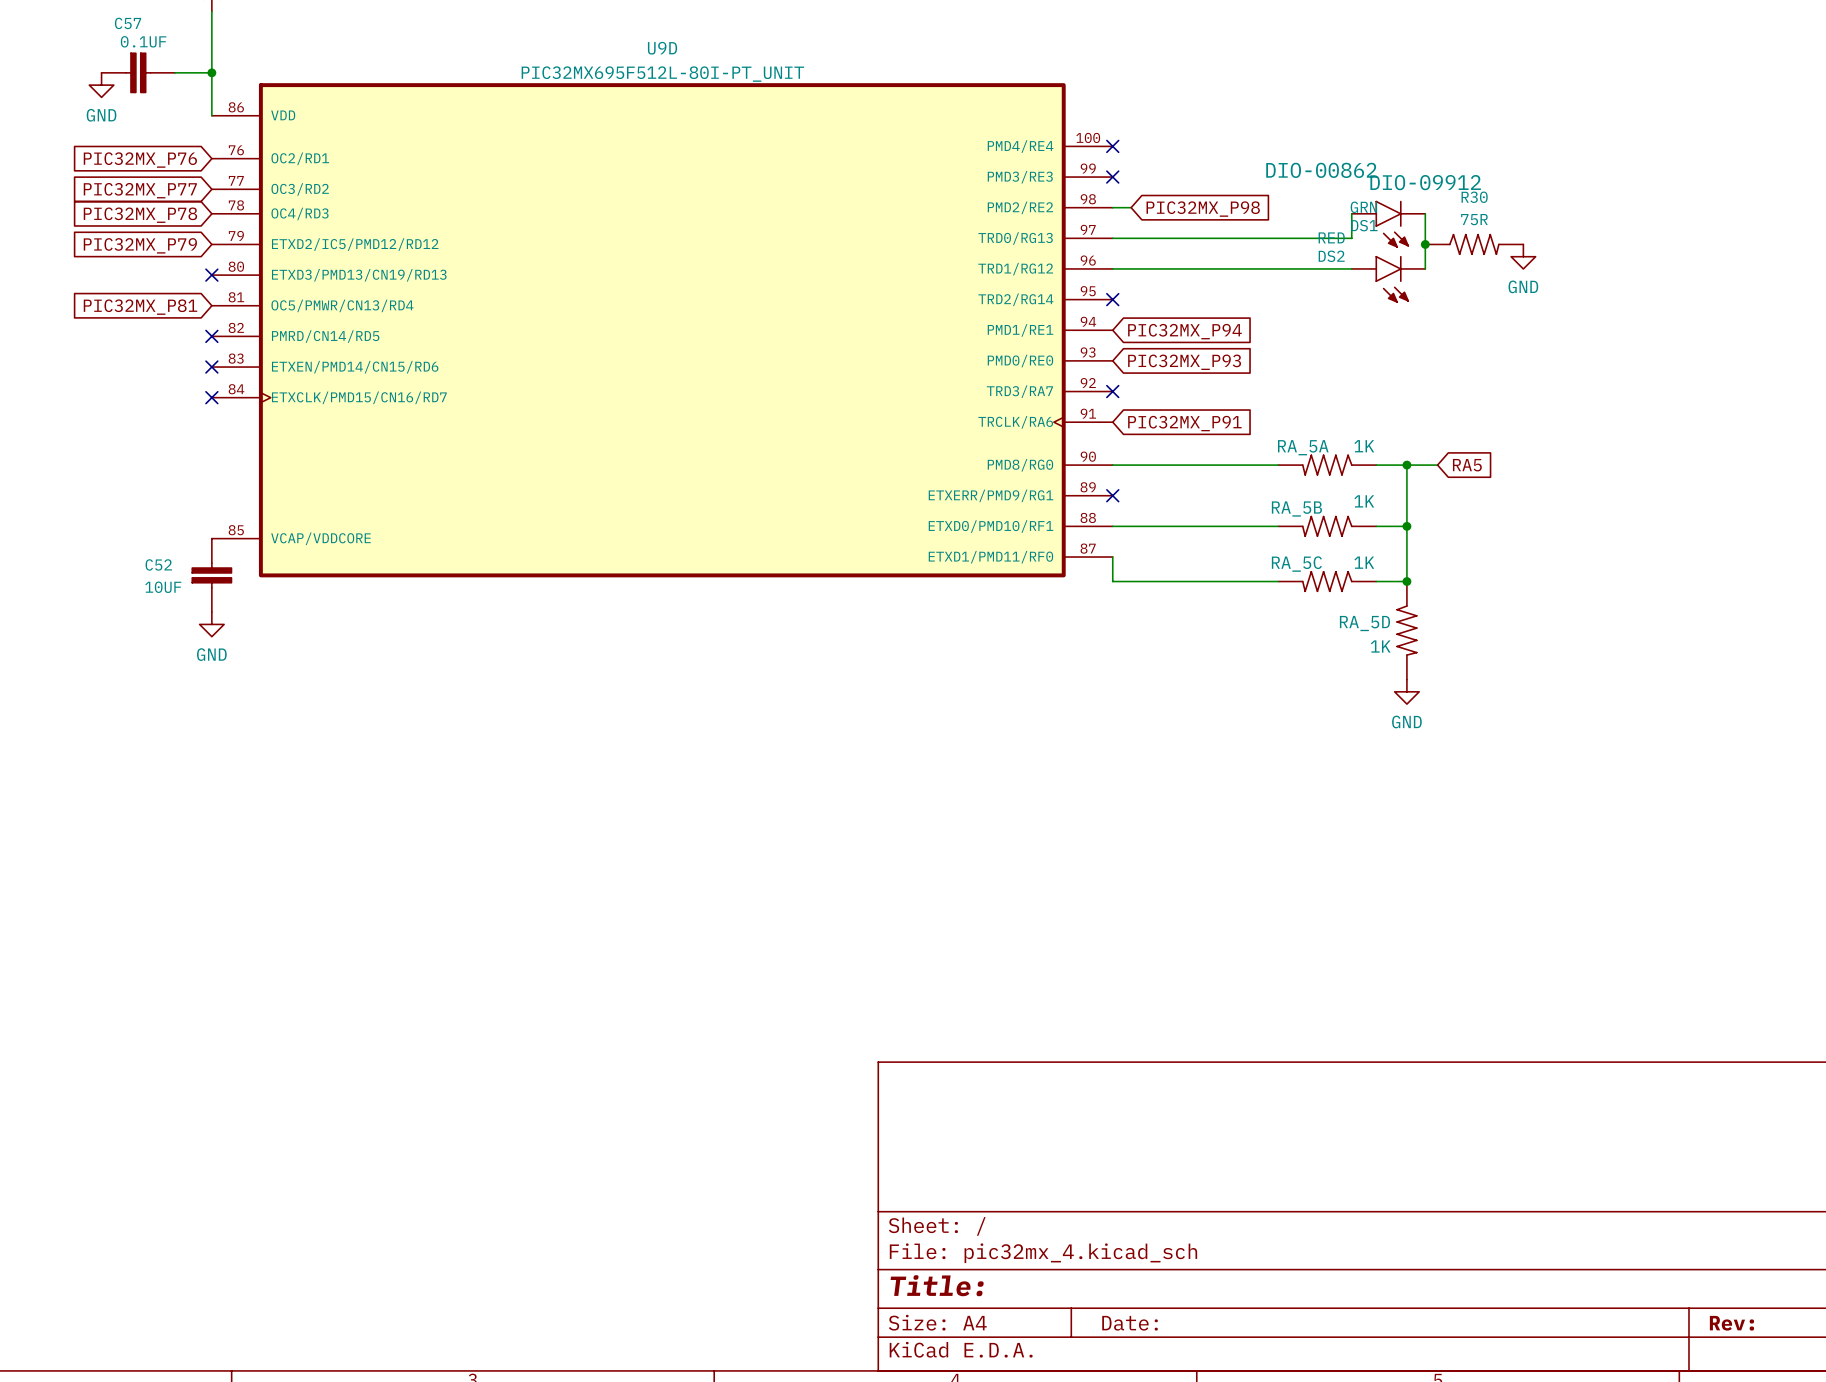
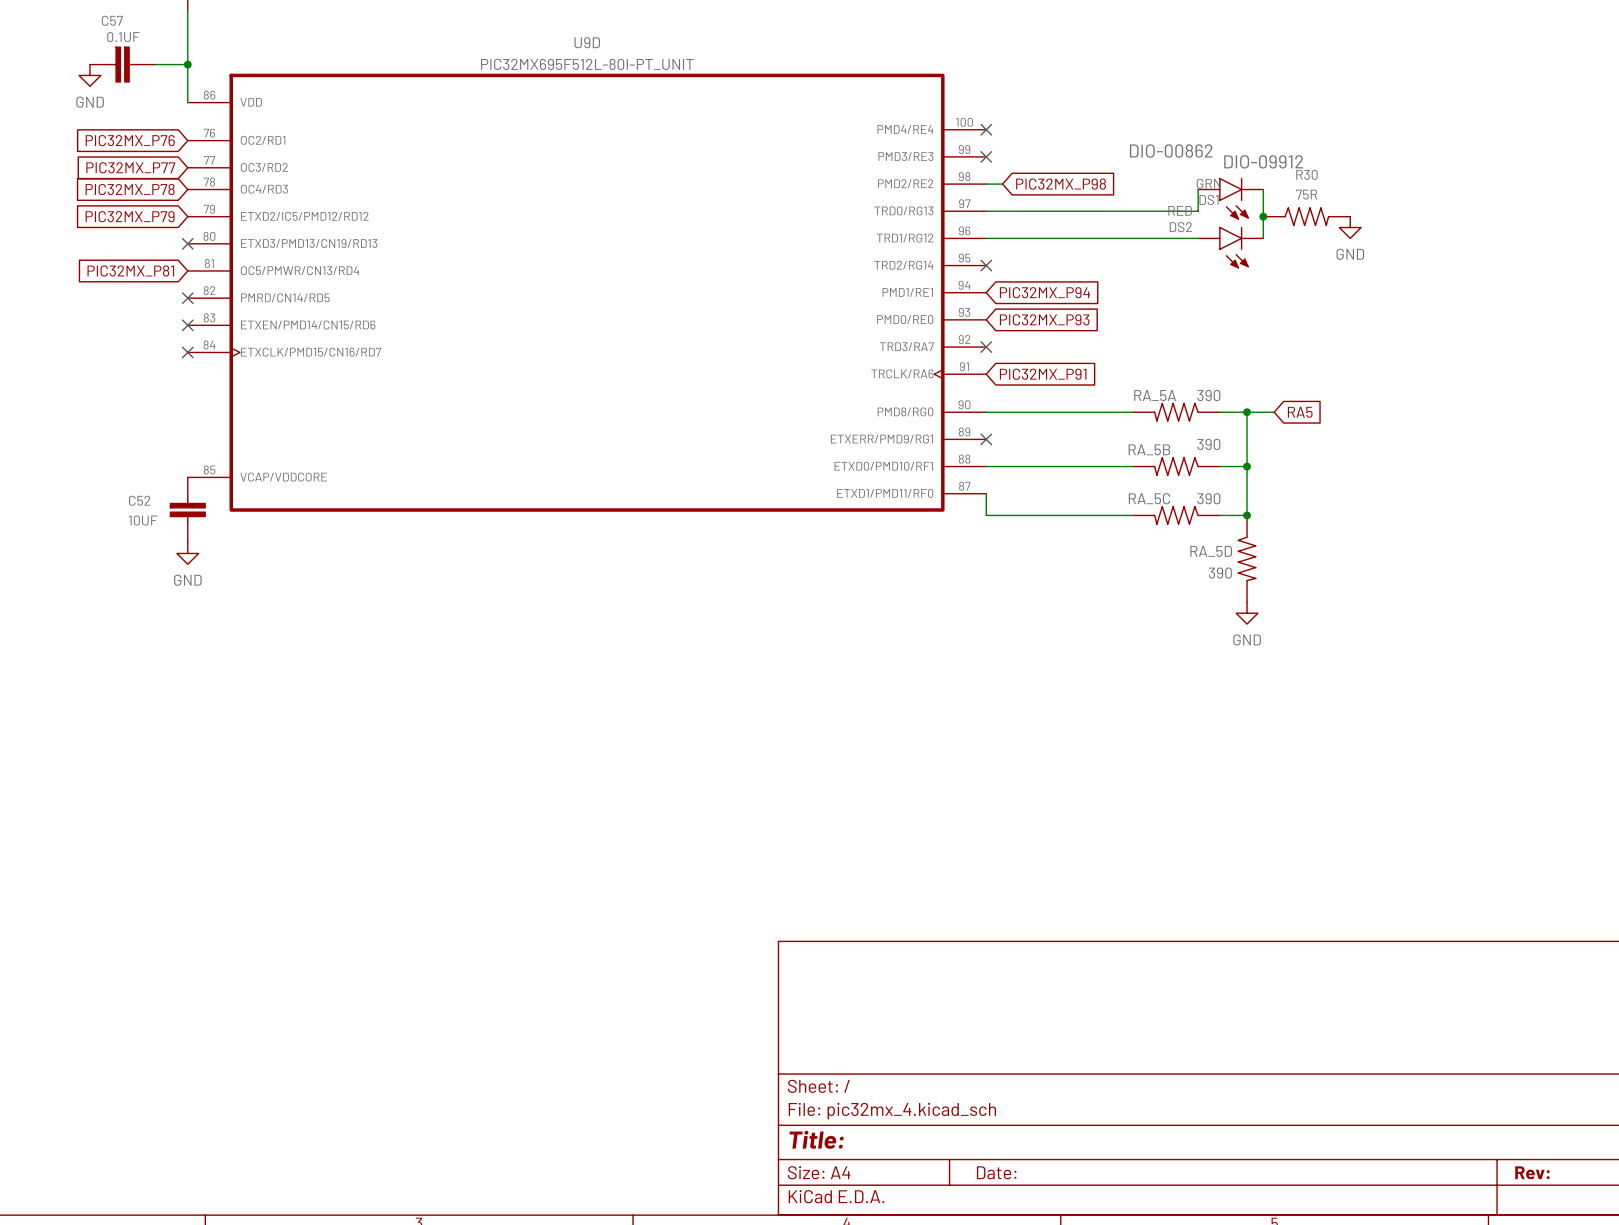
RA_5A value: 1K (1364, 446) -> 390 (1208, 395)
RA_5B value: 1K (1364, 501) -> 390 (1208, 444)
RA_5C value: 1K (1364, 562) -> 390 (1208, 498)
RA_5D value: 1K (1380, 646) -> 390 (1220, 573)

